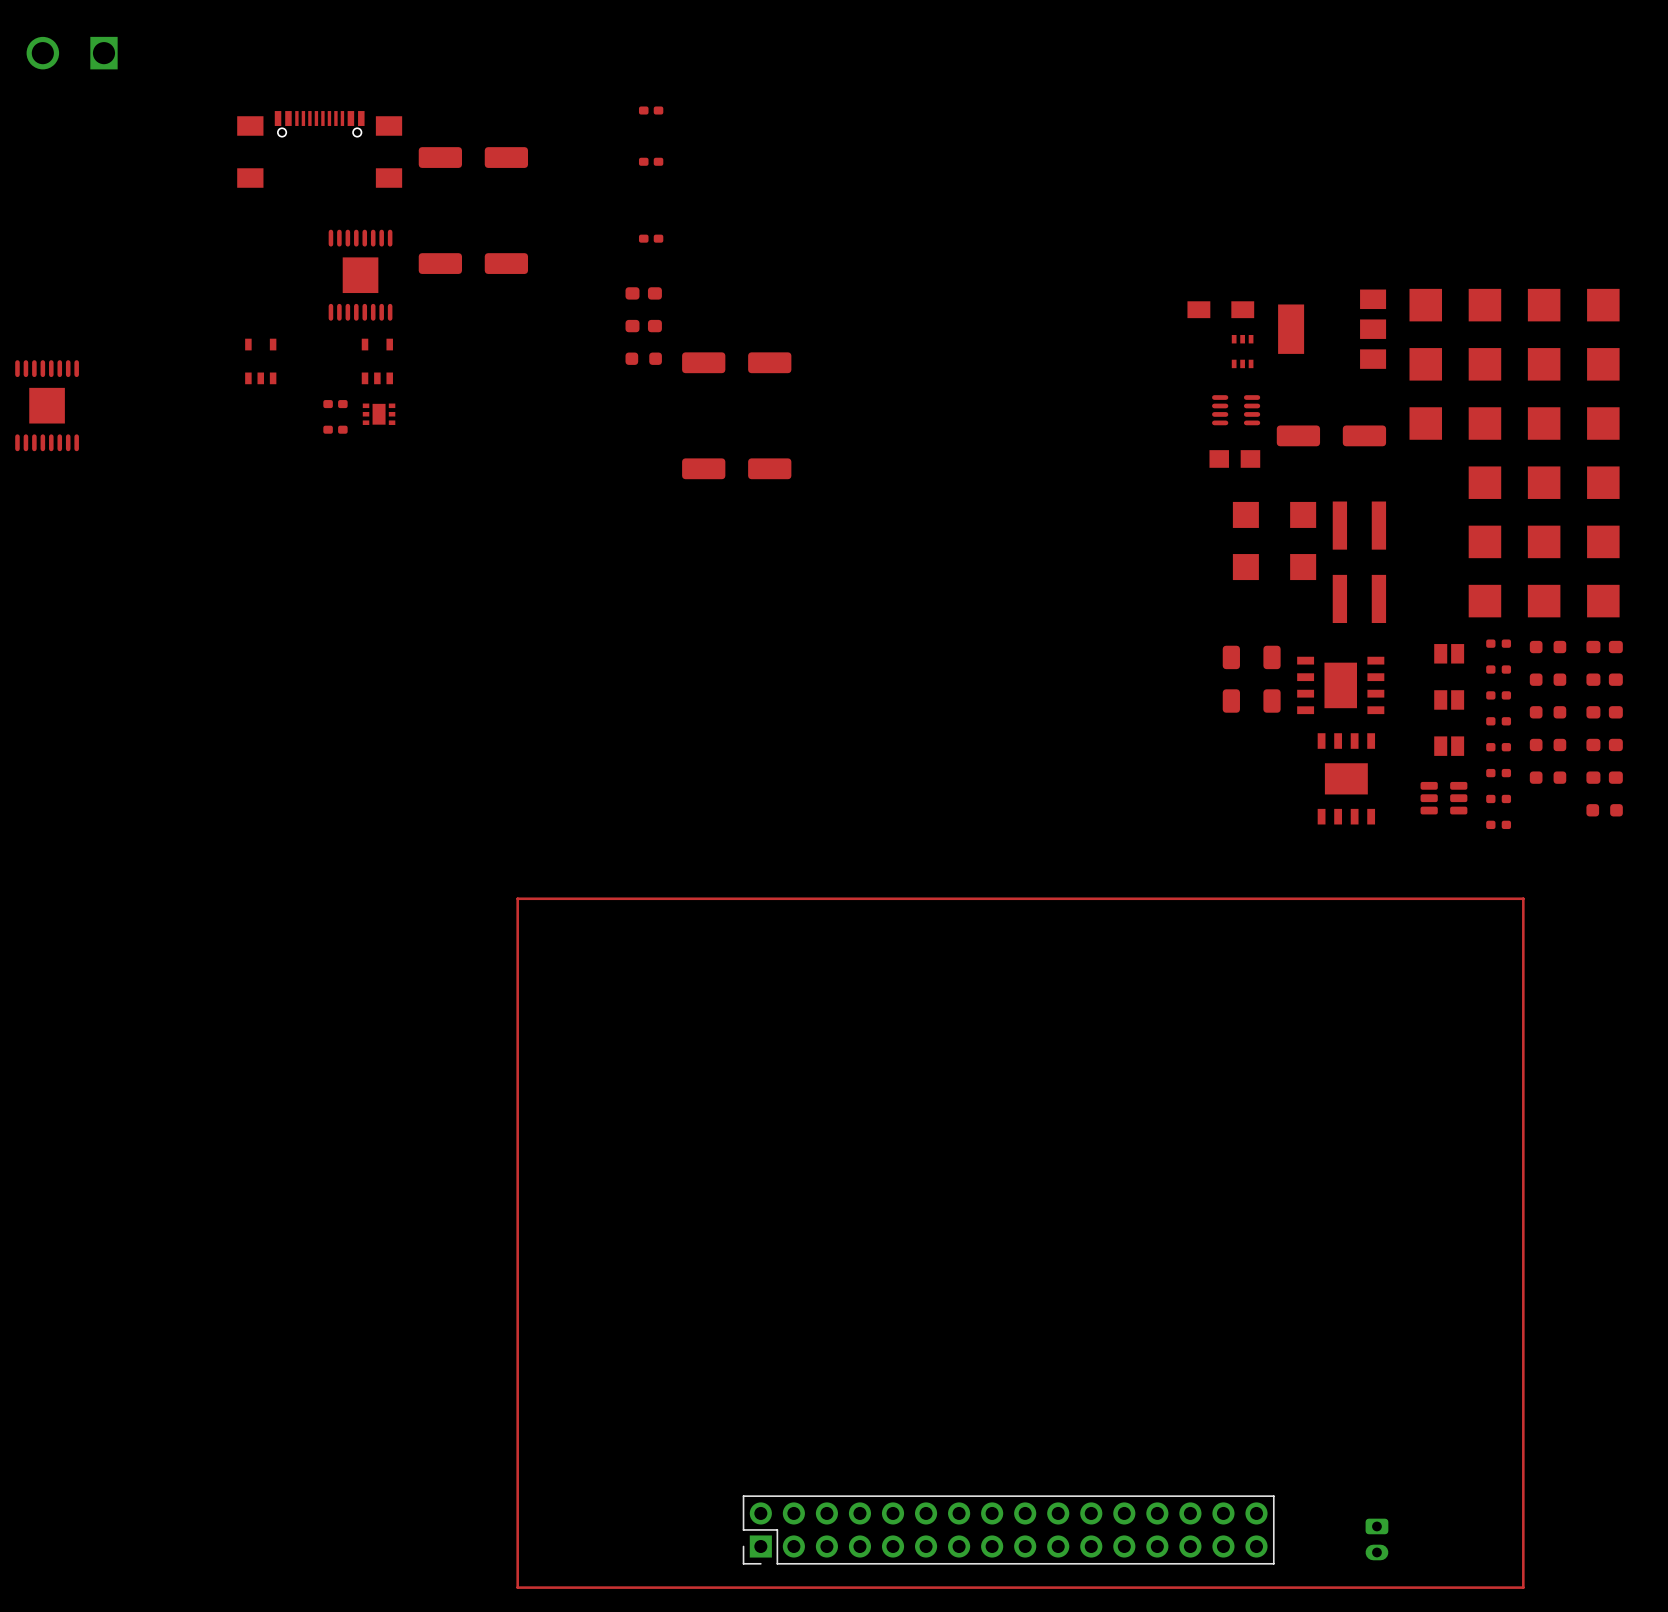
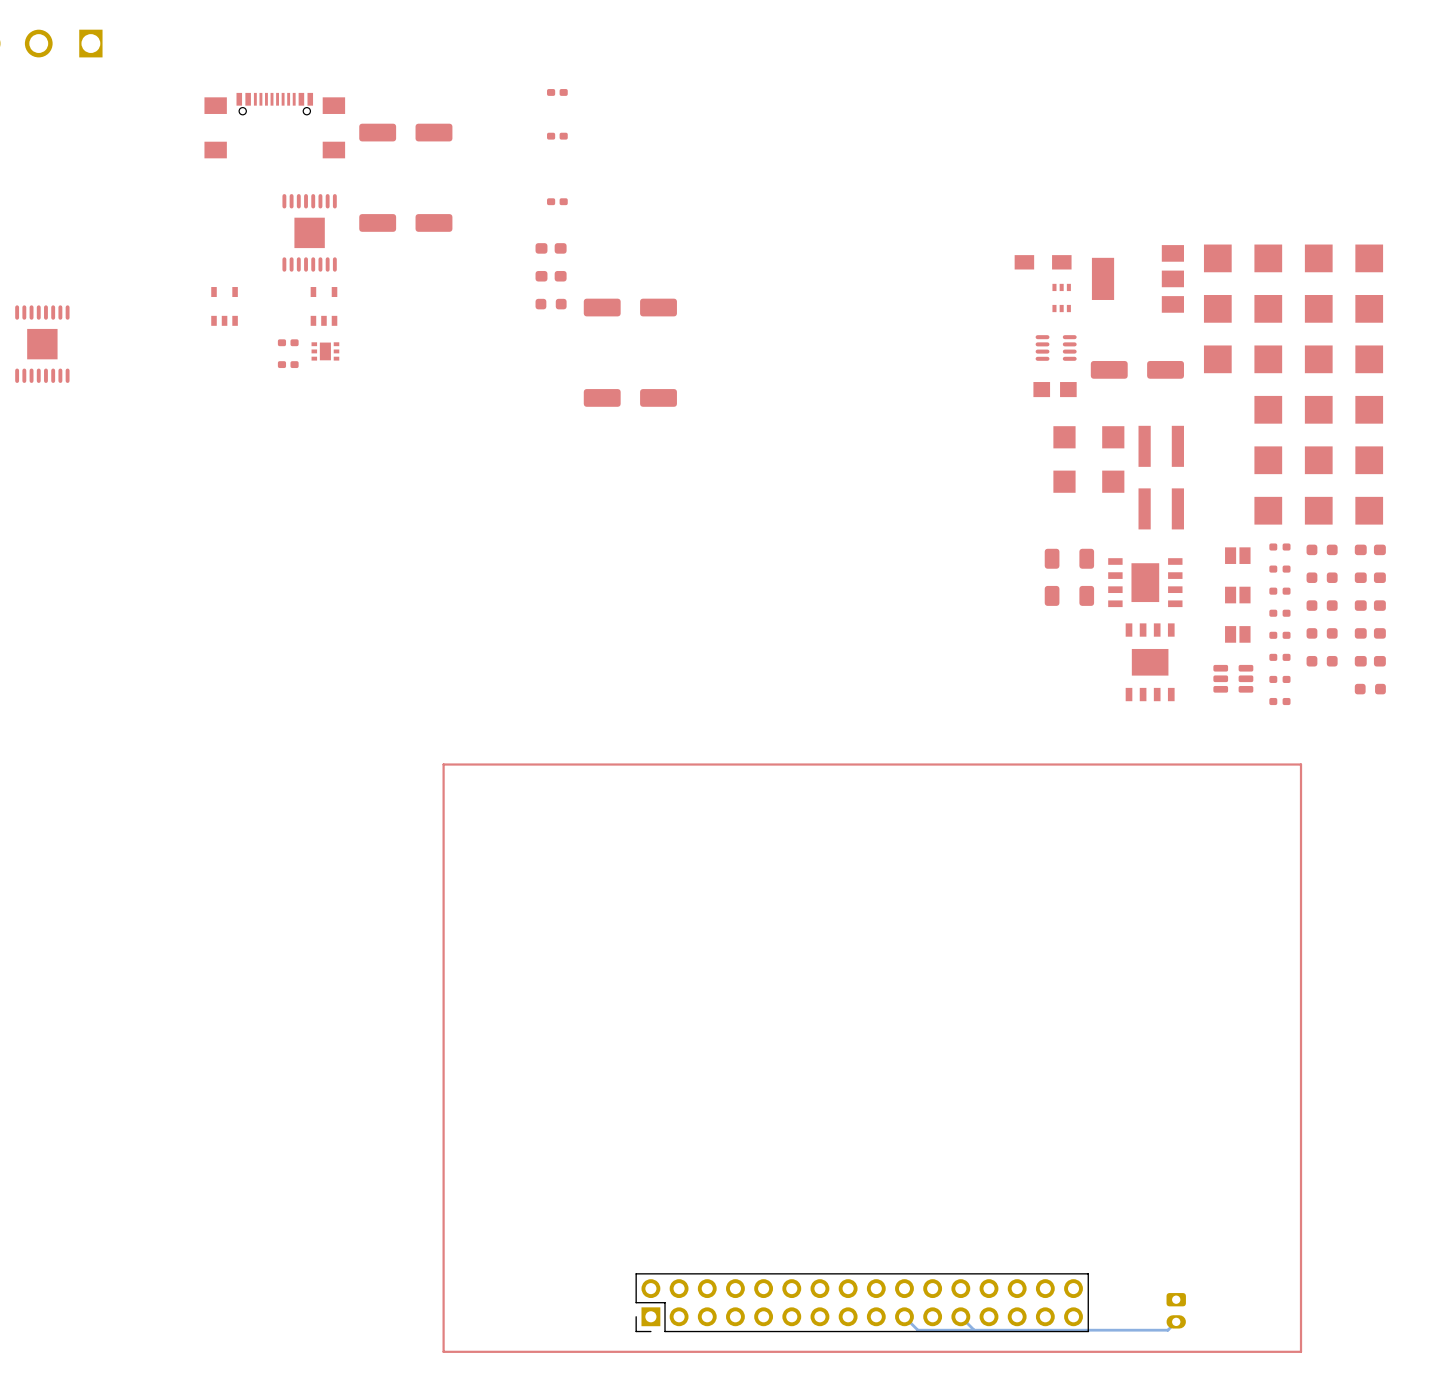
bottom track: none -> (904, 1316) (917, 1330) (1167, 1330) (1176, 1321)
bottom track: none -> (960, 1316) (974, 1330)

